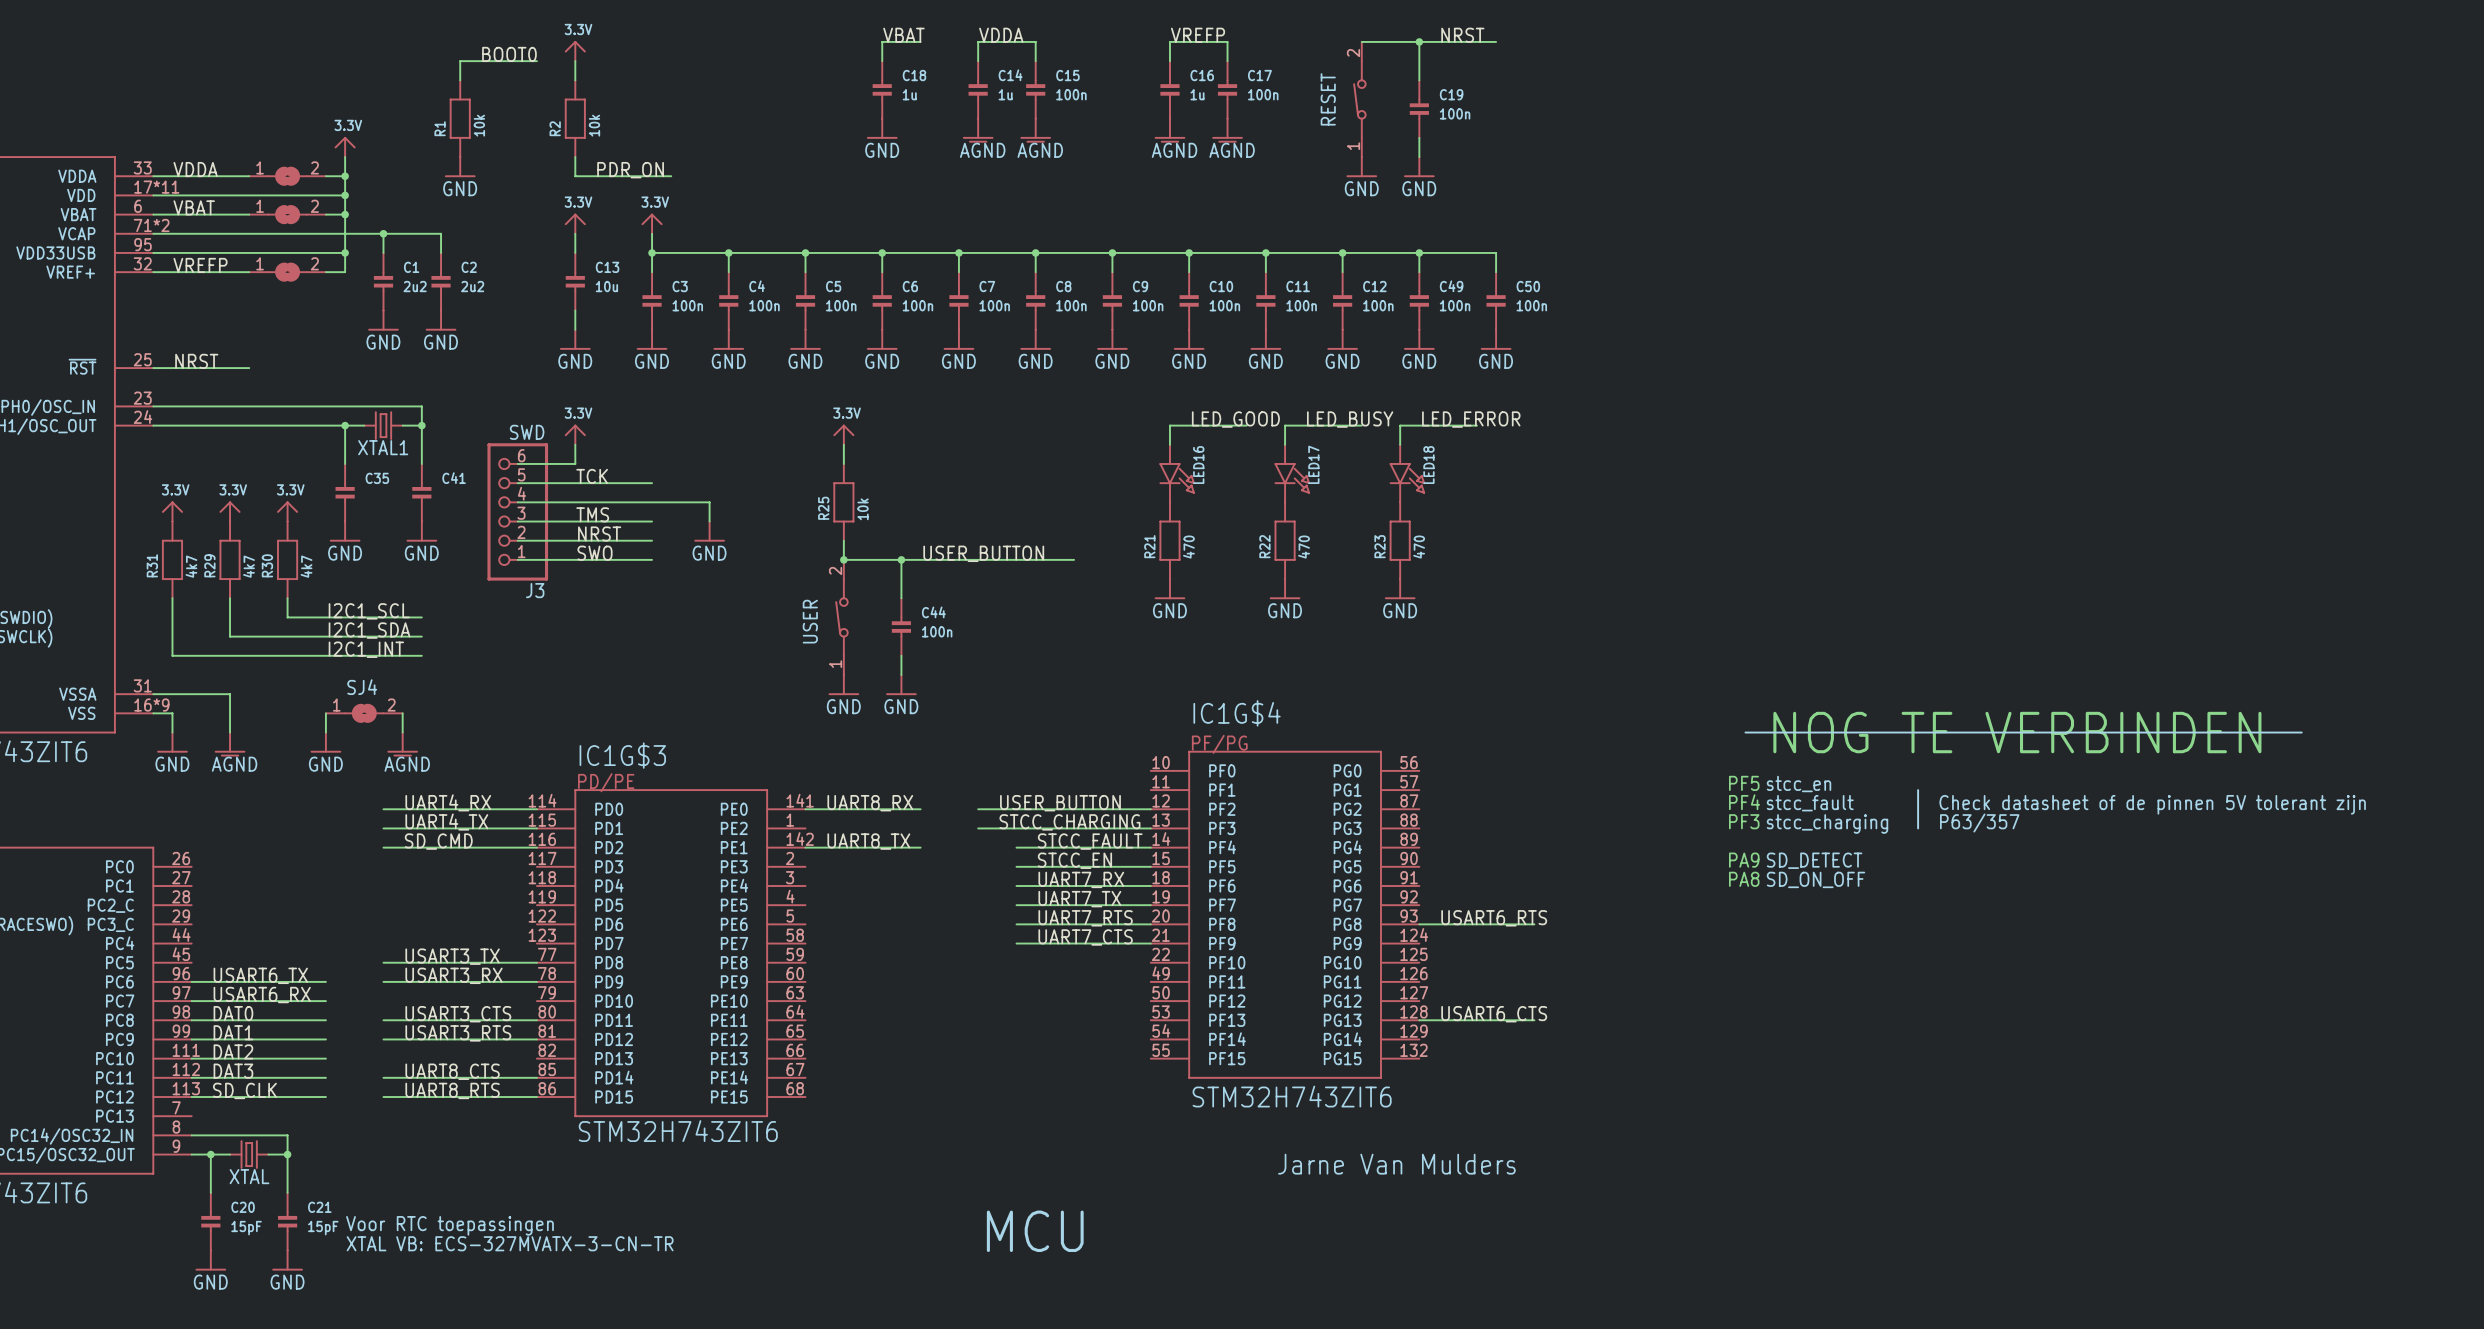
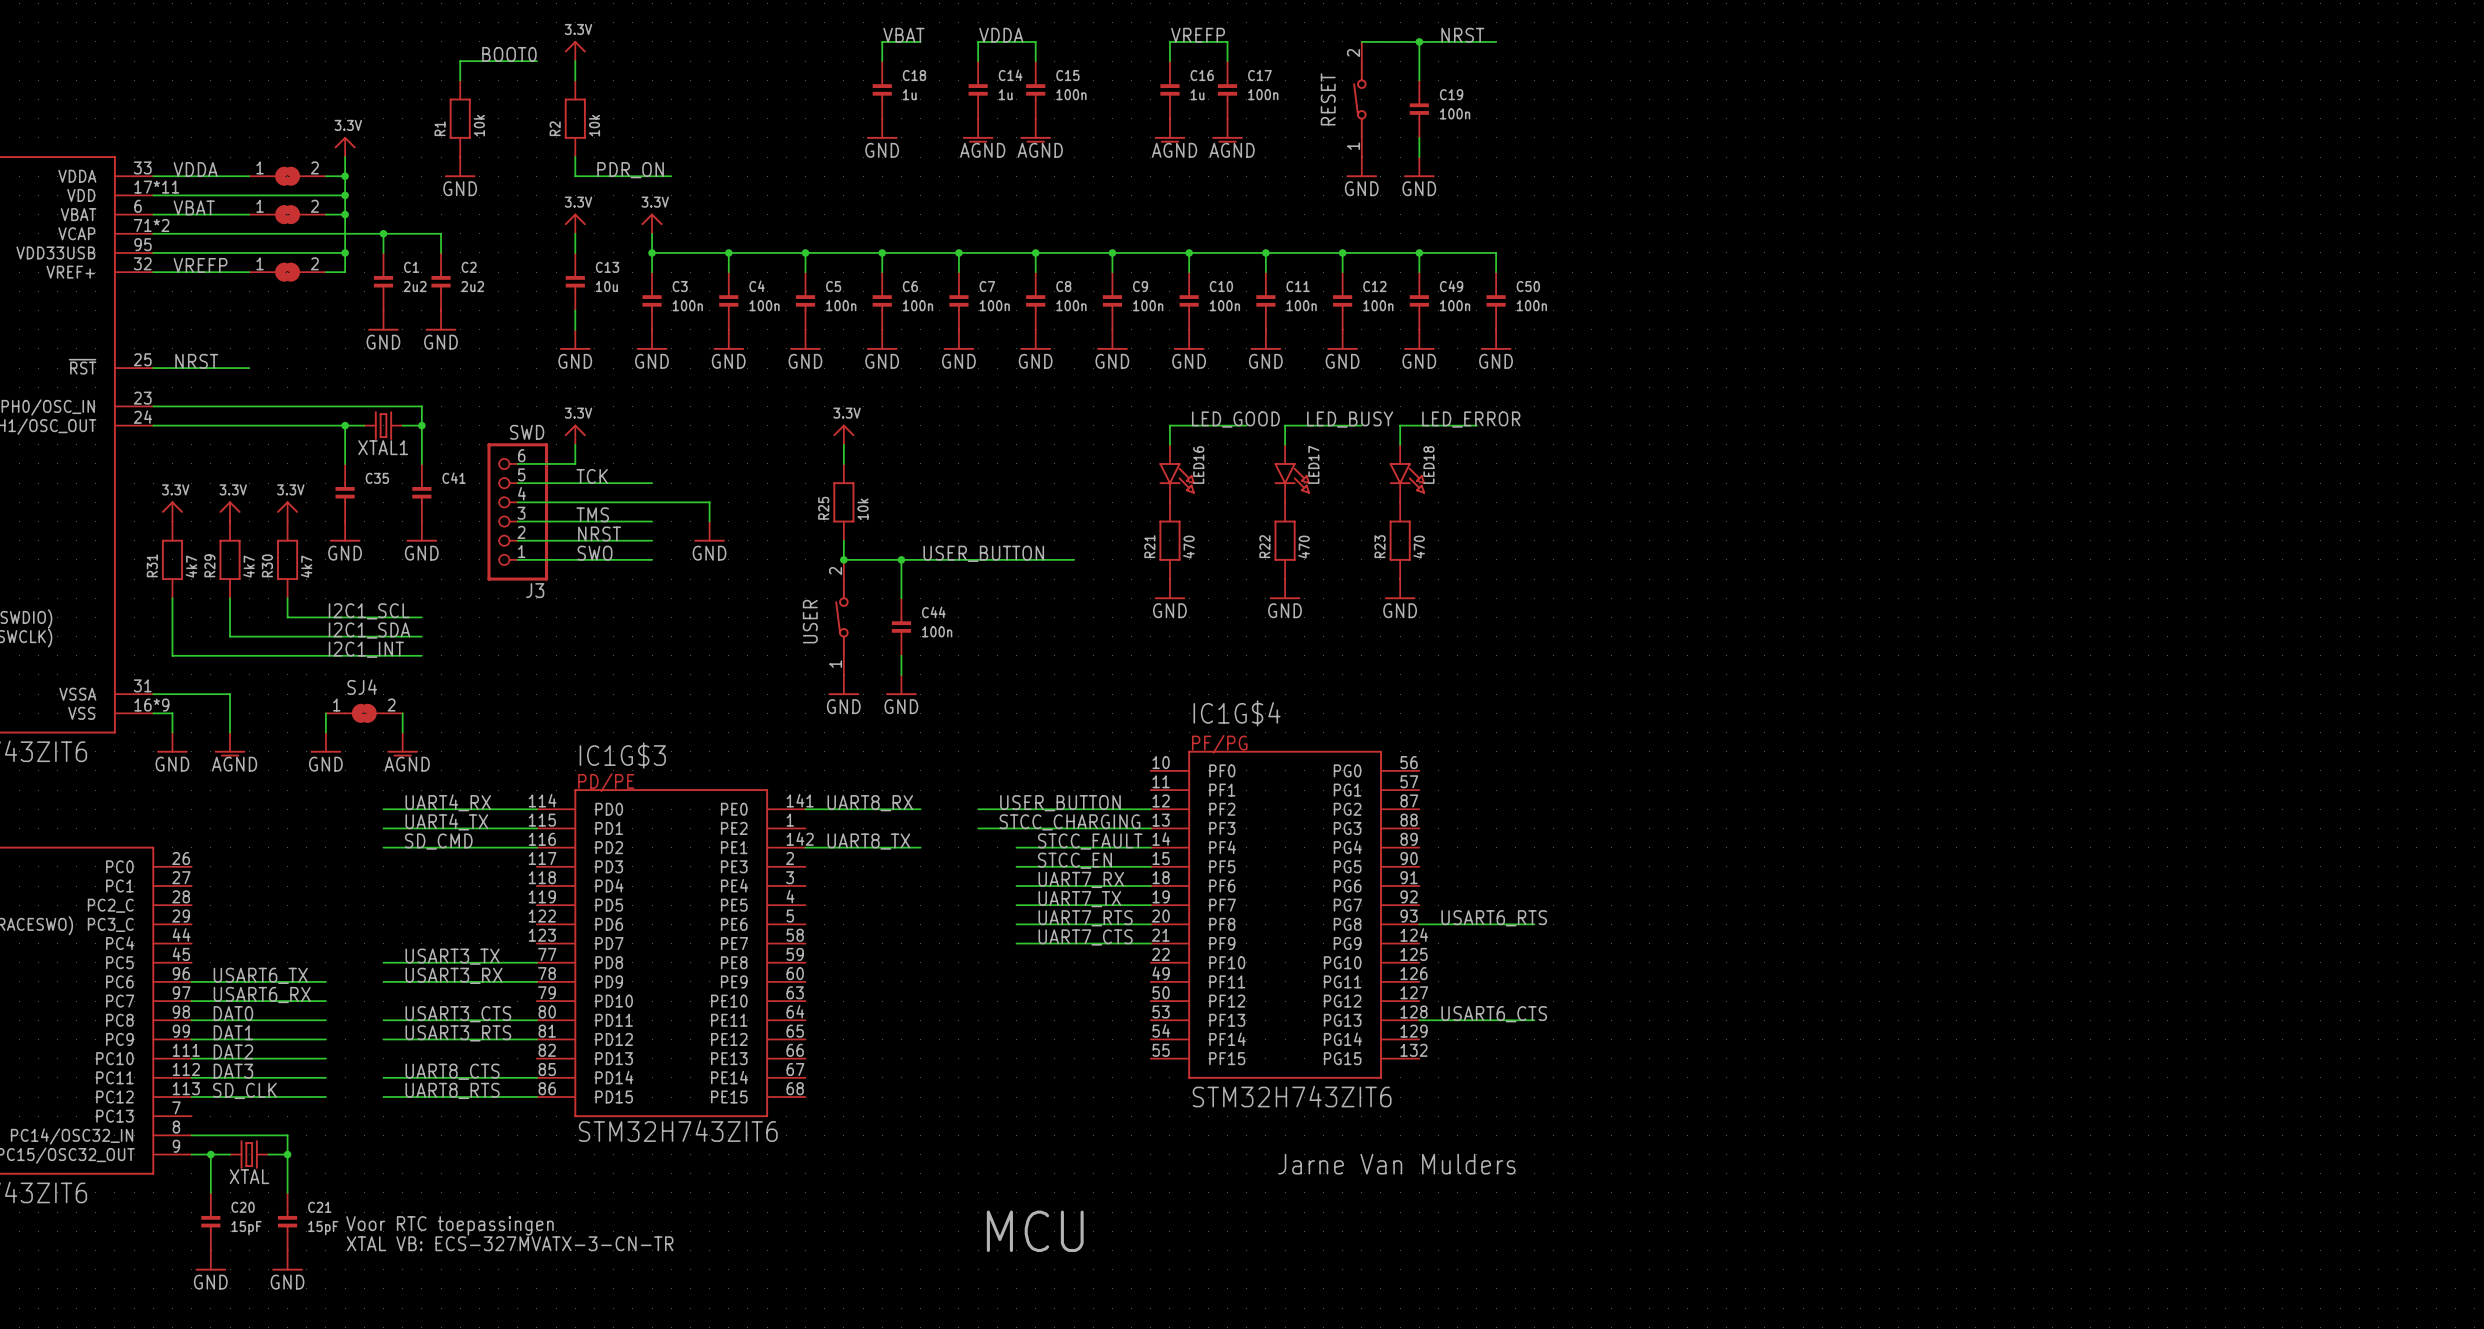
line: (1745, 732) (2301, 732) -> none
text: NOG TE VERBINDEN (2017, 732) -> none
text: PF5 (1744, 783) -> none
text: stcc_en (1799, 784) -> none
line: (1918, 790) (1918, 828) -> none
text: PF4 (1744, 802) -> none
text: stcc_fault (1810, 803) -> none
text: Check datasheet of de pinnen 5V tolerant zijn (2152, 804) -> none
text: PF3 (1744, 821) -> none
text: stcc_charging (1827, 823) -> none
text: P63/357 (1979, 823) -> none
text: PA9 (1744, 860) -> none
text: SD_DETECT (1814, 860) -> none
text: PA8 (1744, 879) -> none
text: SD_ON_OFF (1815, 879) -> none

